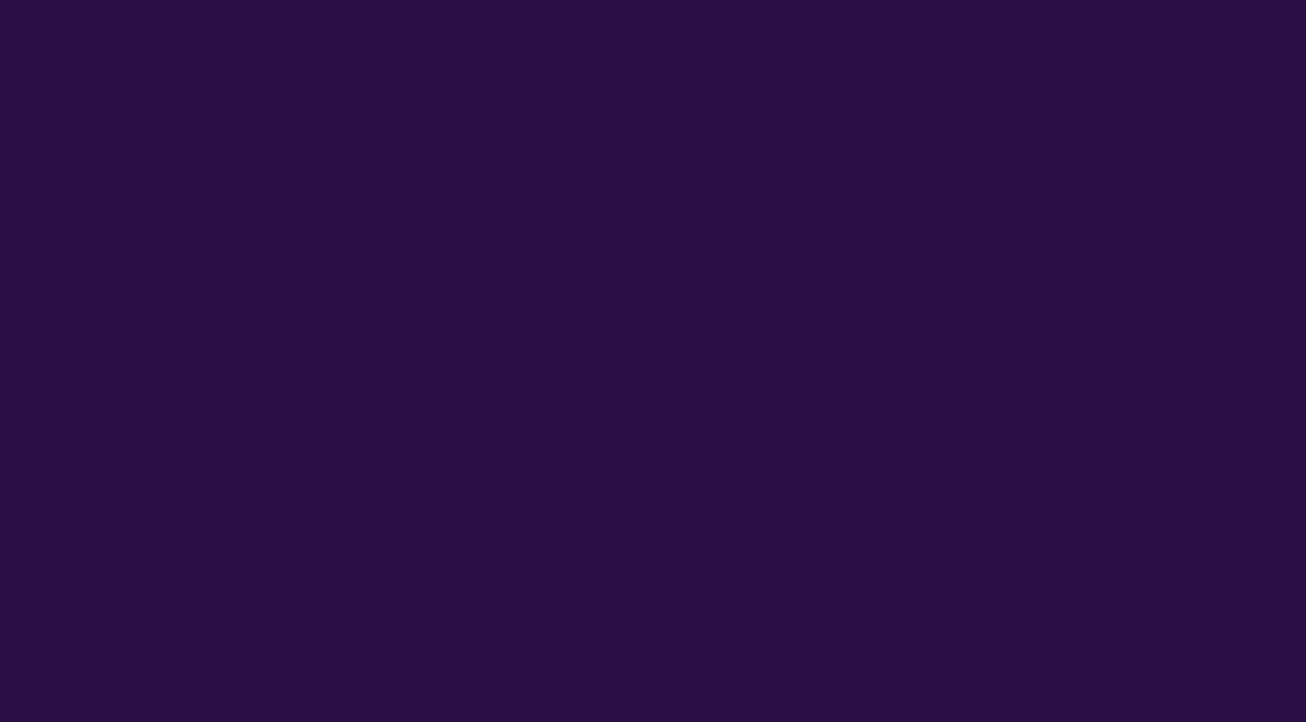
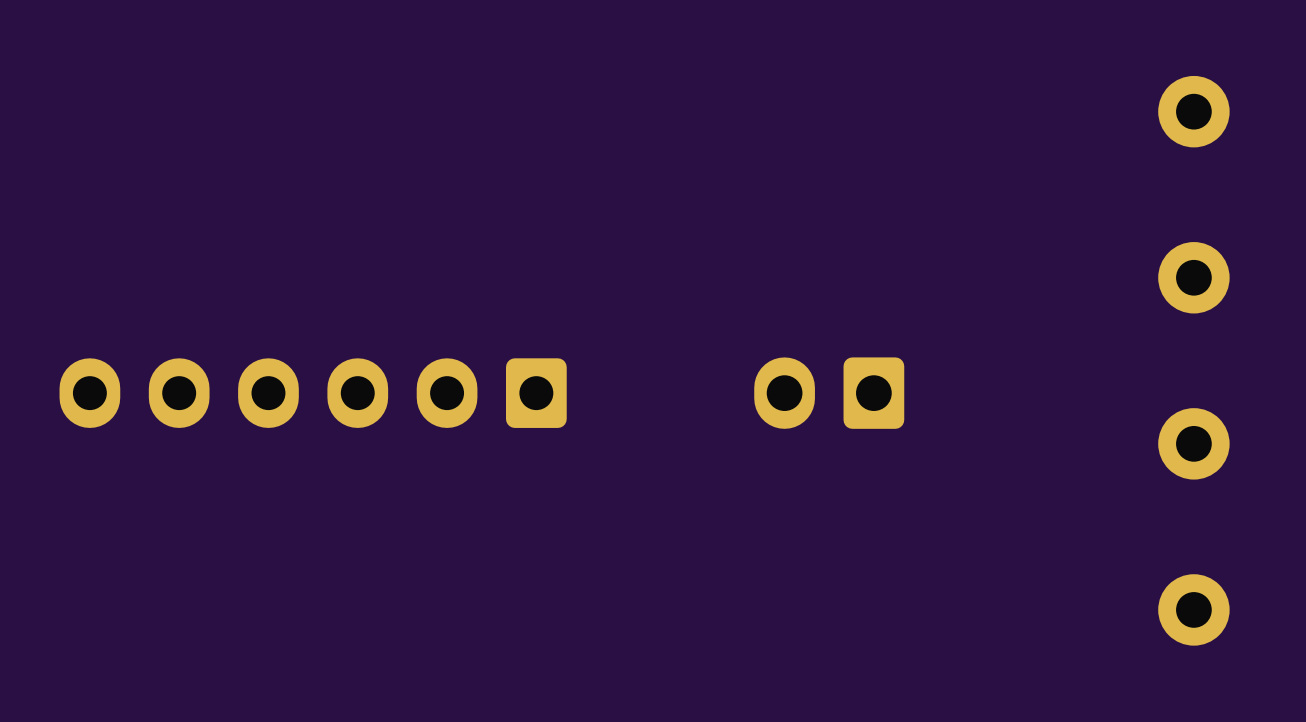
part: none -> (1193, 111)
part: none -> (1193, 277)
part: none -> (313, 393)
part: none -> (829, 393)
part: none -> (1193, 443)
part: none -> (1193, 609)

